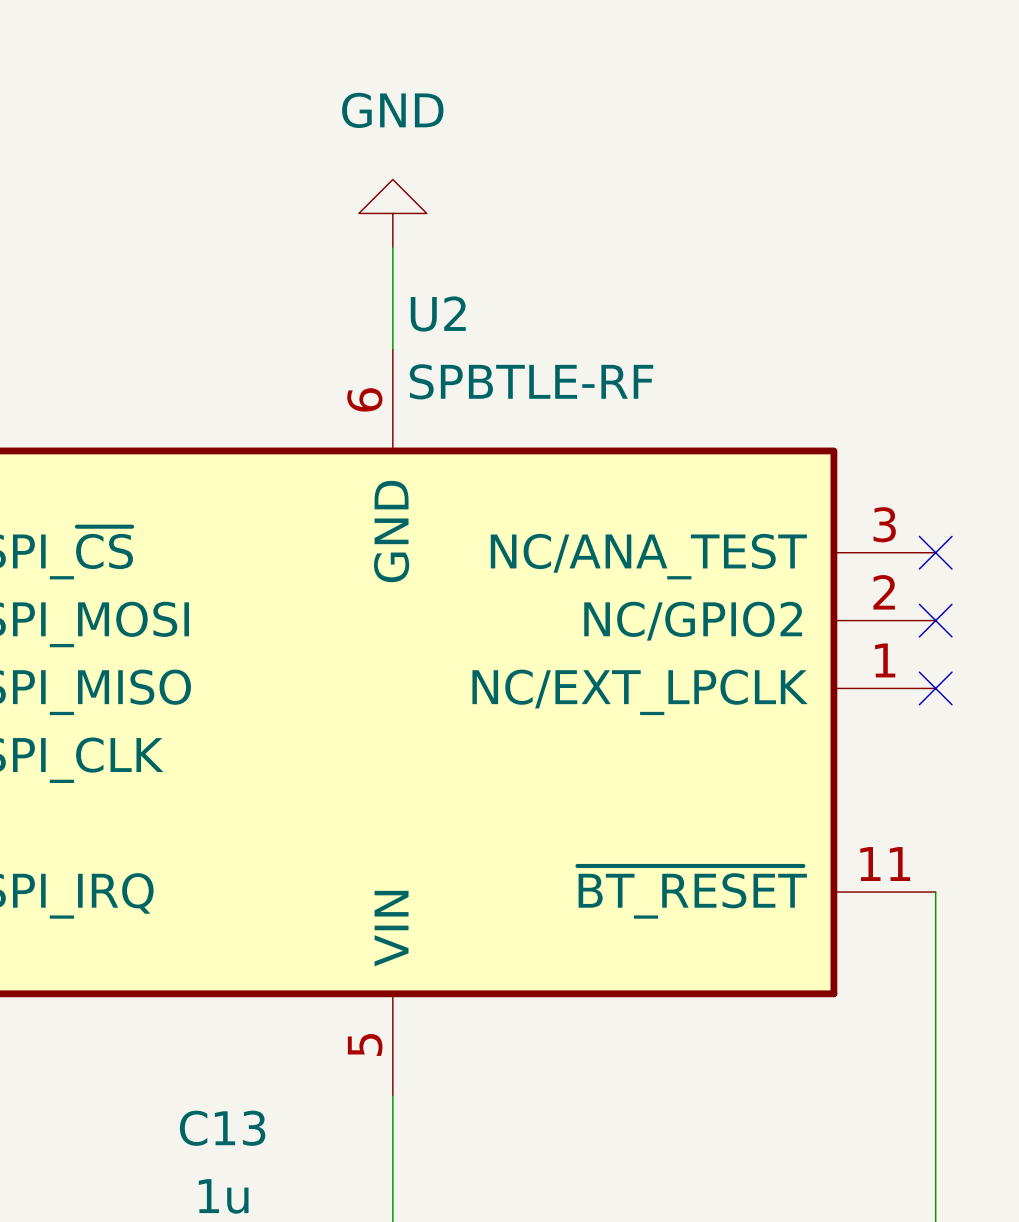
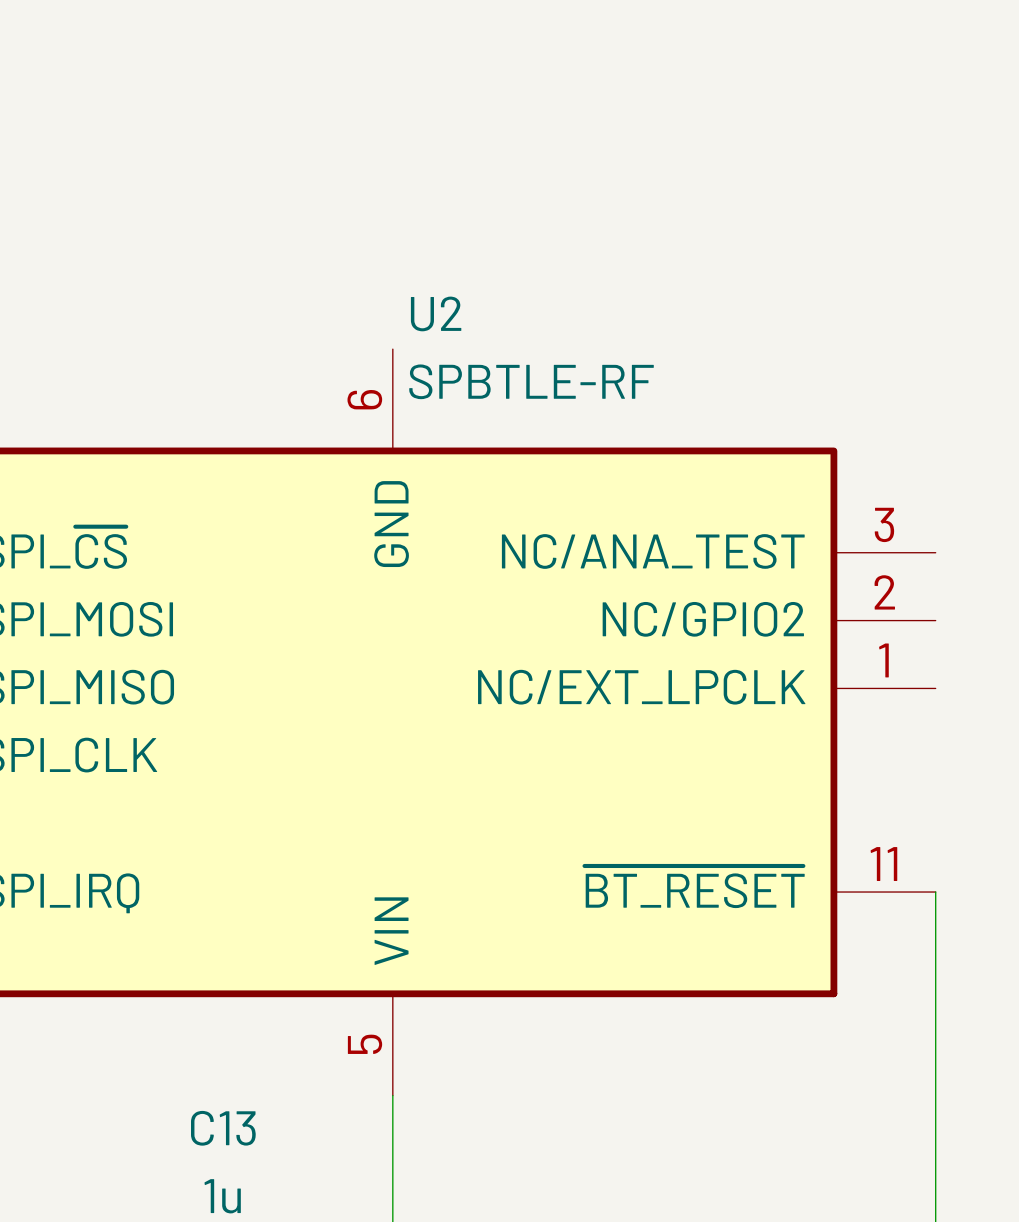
power symbol: GND (392, 213) -> none
wire: (392, 247) (392, 349) -> none
no-connect mark: (935, 552) -> none
no-connect mark: (935, 620) -> none
no-connect mark: (935, 688) -> none

